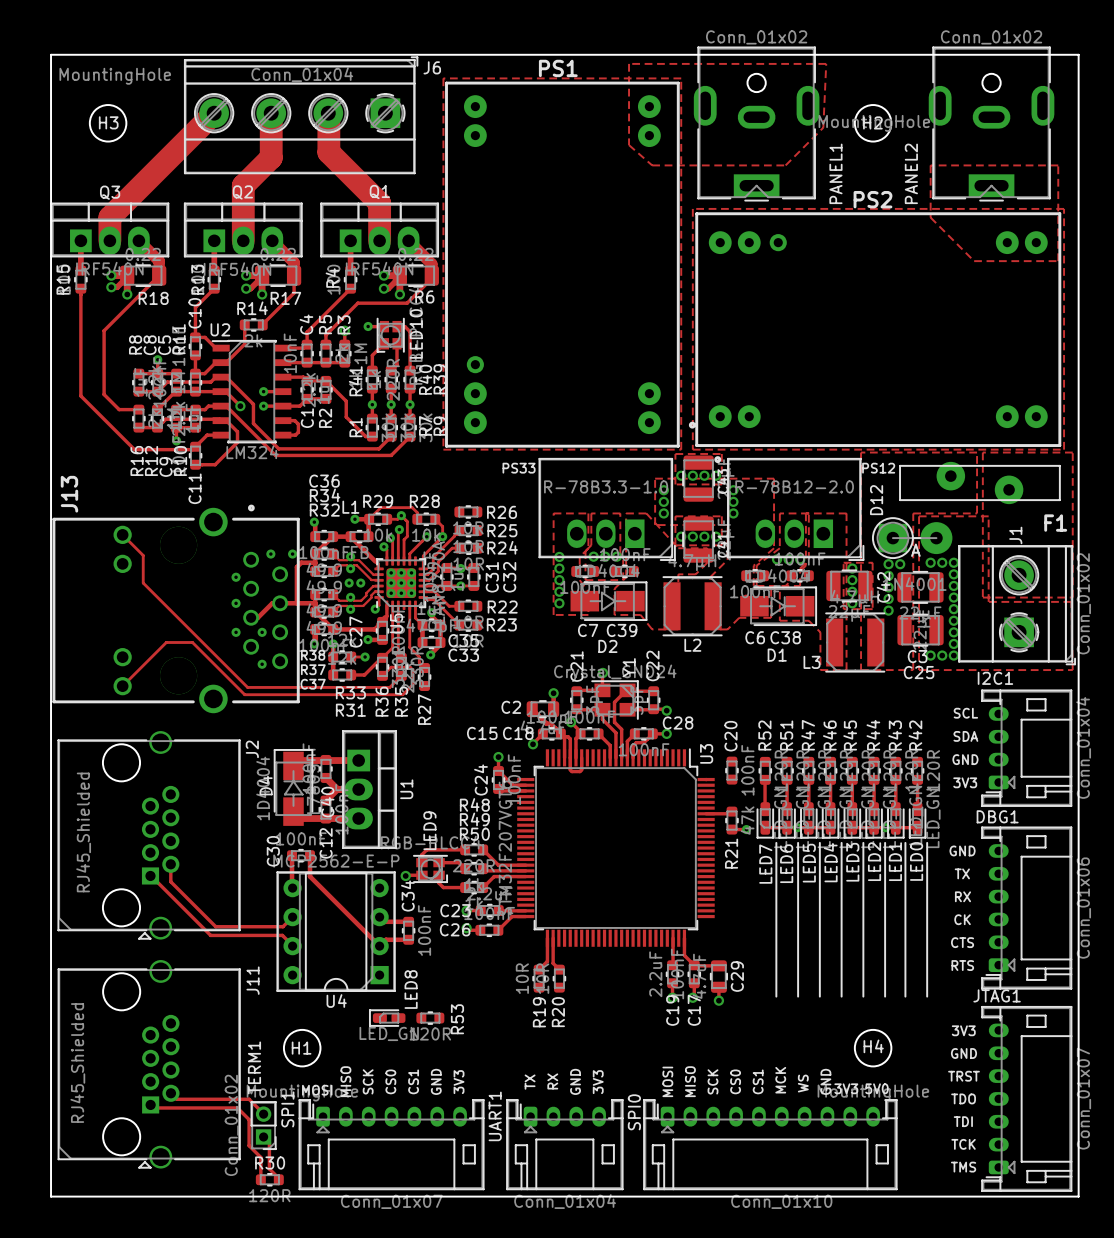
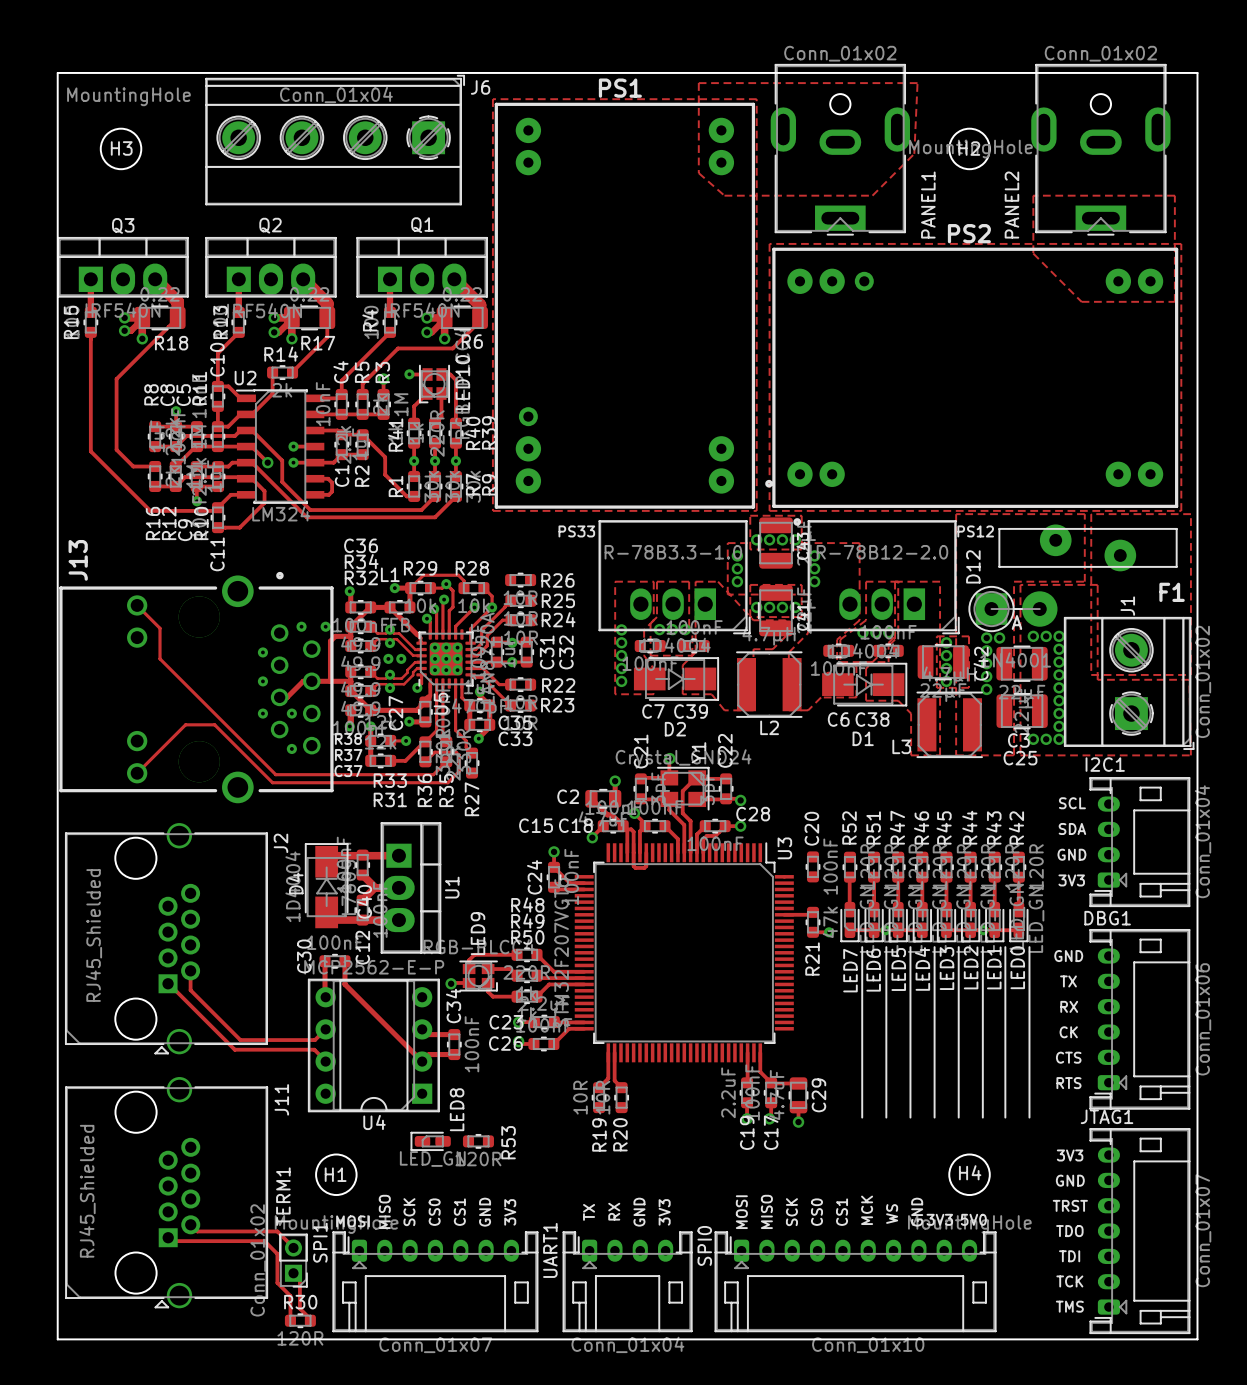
track: (214, 113) (109, 217) (109, 240) -> none
track: (271, 113) (271, 157) (243, 185) (243, 240) -> none
track: (328, 113) (328, 152) (379, 203) (379, 240) -> none

